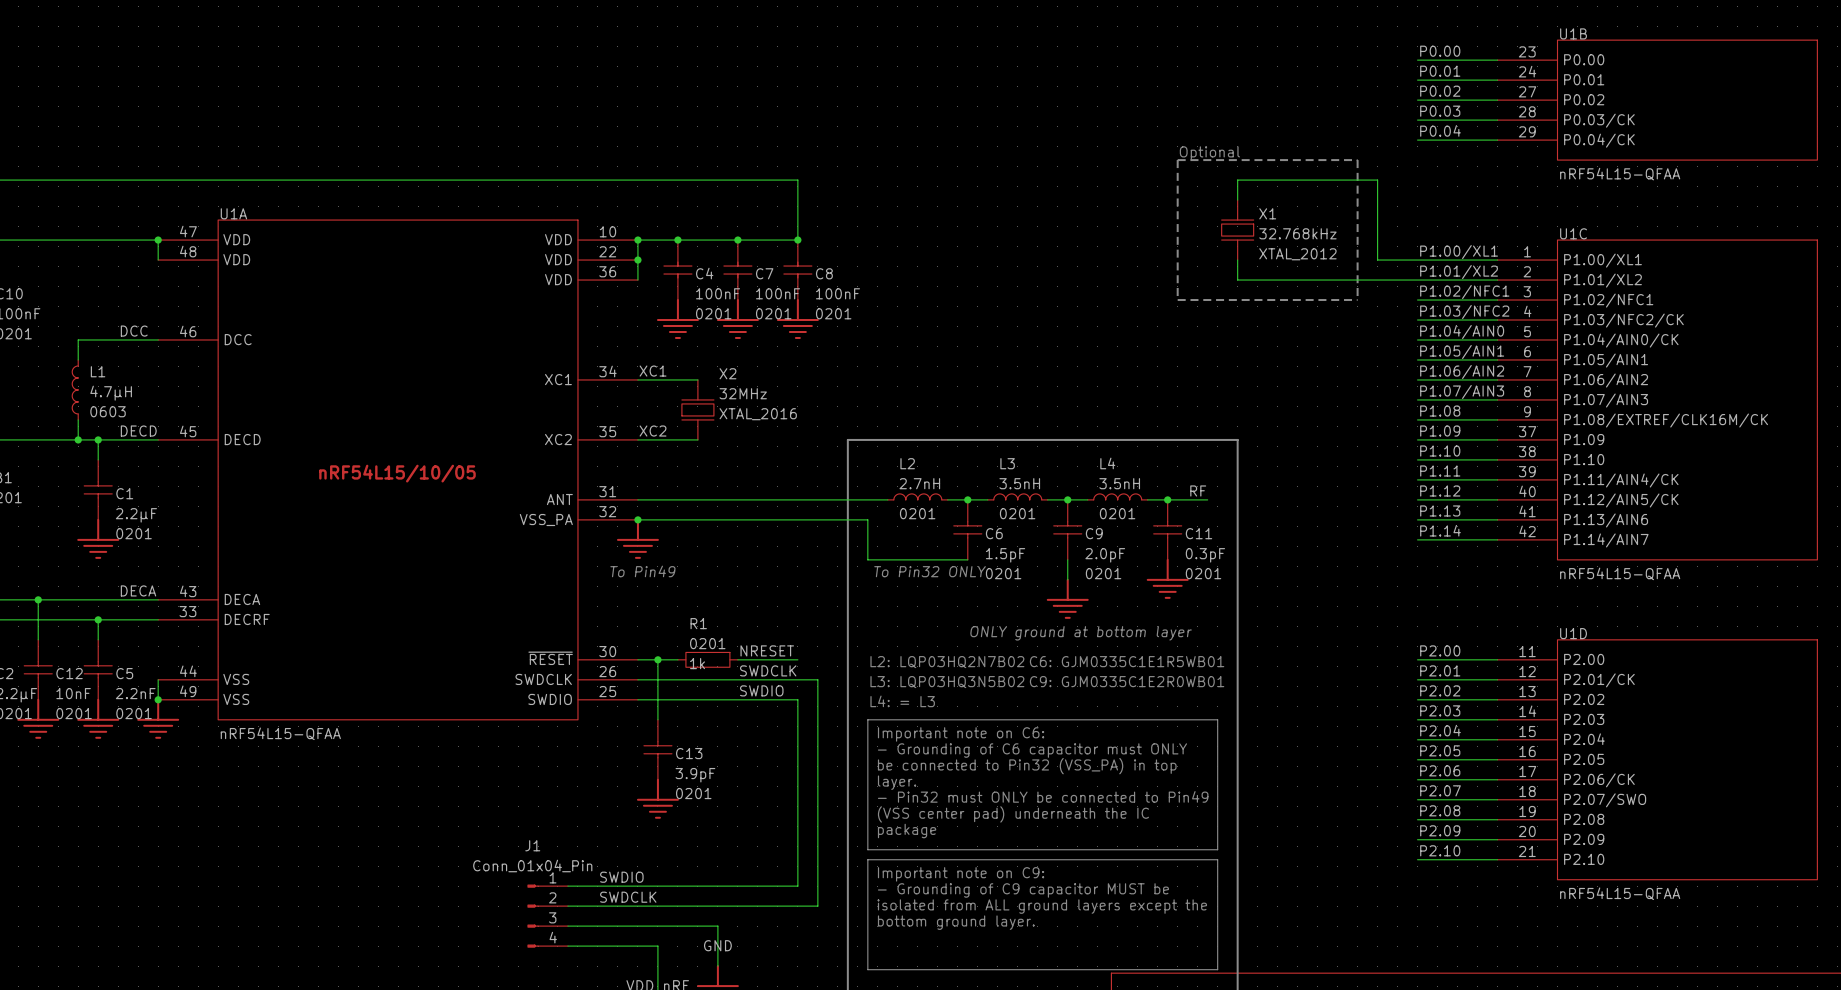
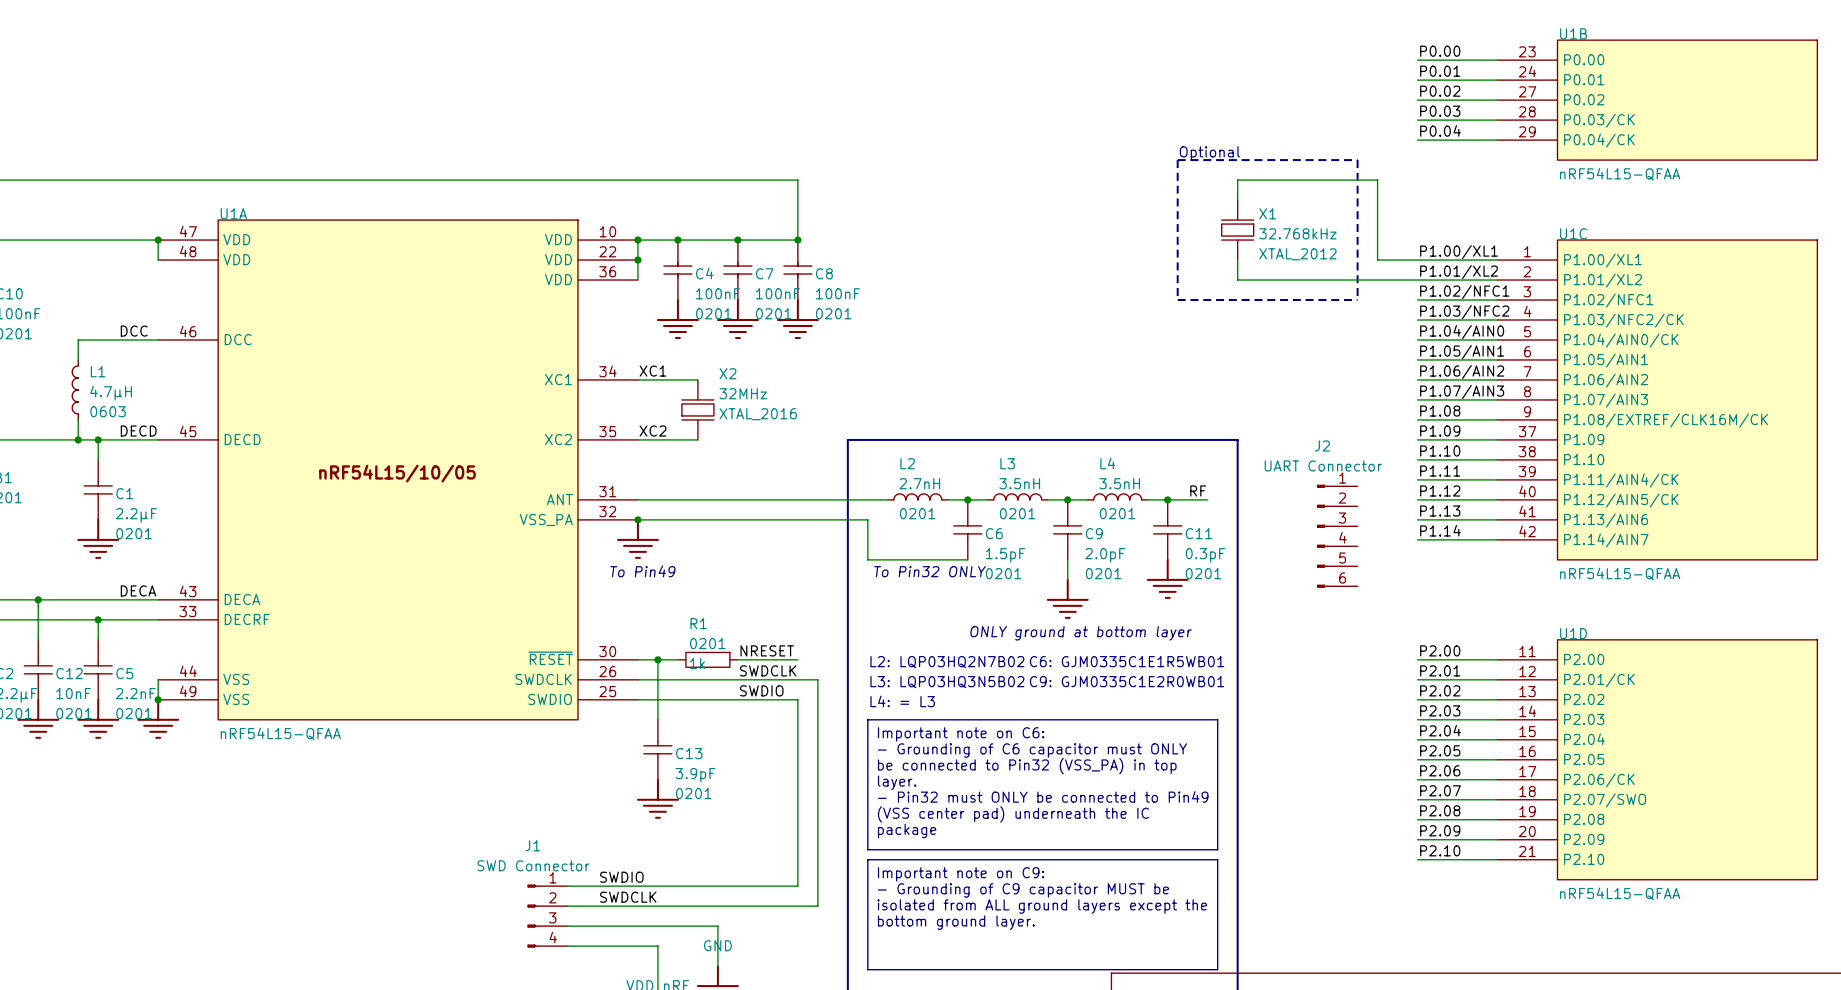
J2: none -> UART Connector (1337, 536)
J1 value: Conn_01x04_Pin (532, 866) -> SWD Connector (533, 865)

